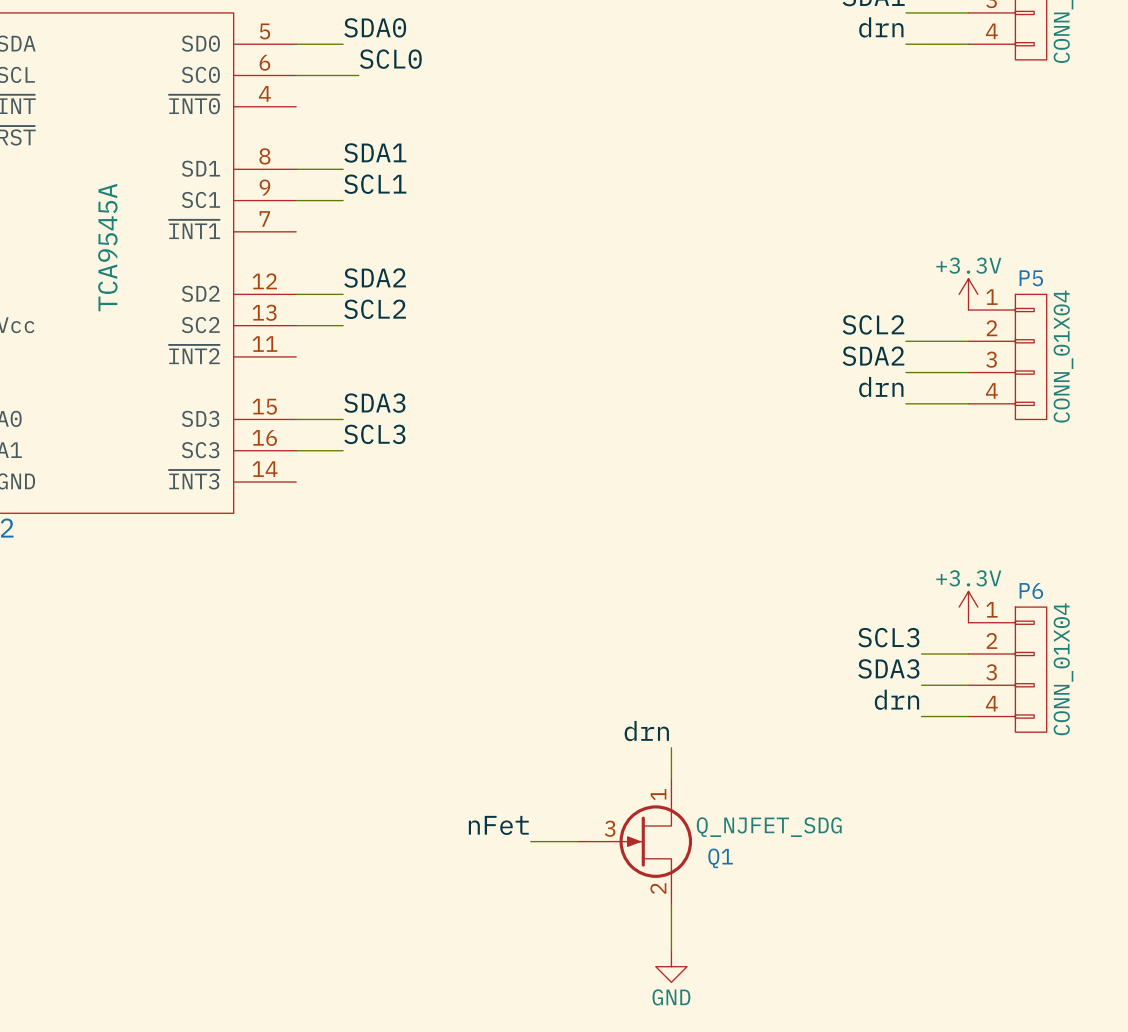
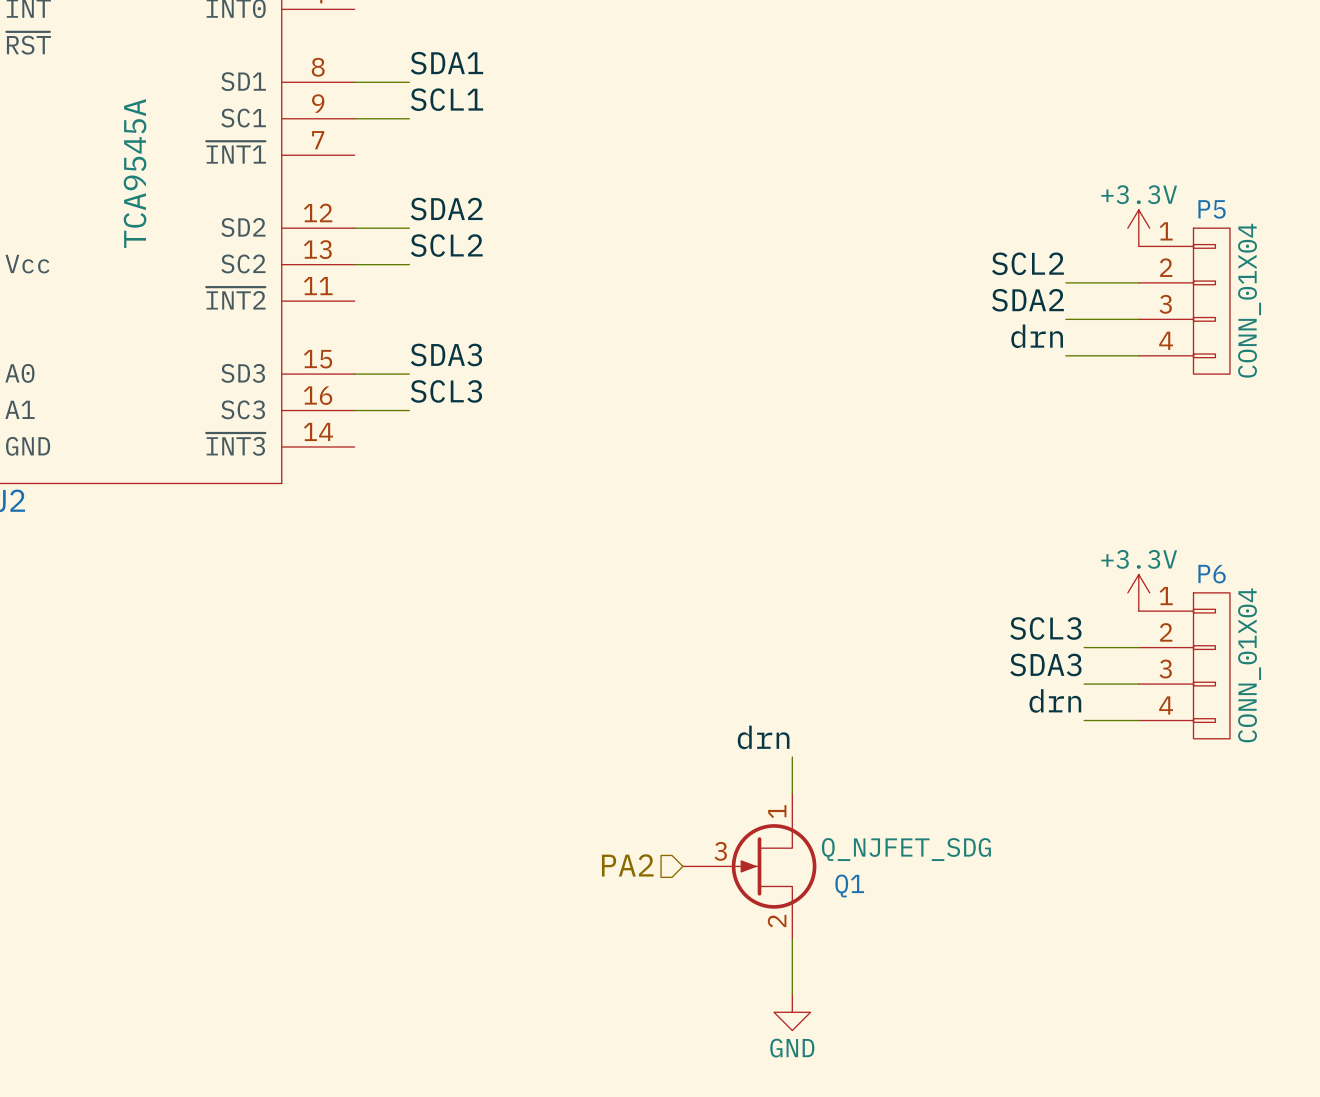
label: nFet (498, 825) -> none
hierarchical label: none -> PA2 (627, 865)
wire: (530, 841) (577, 841) -> none

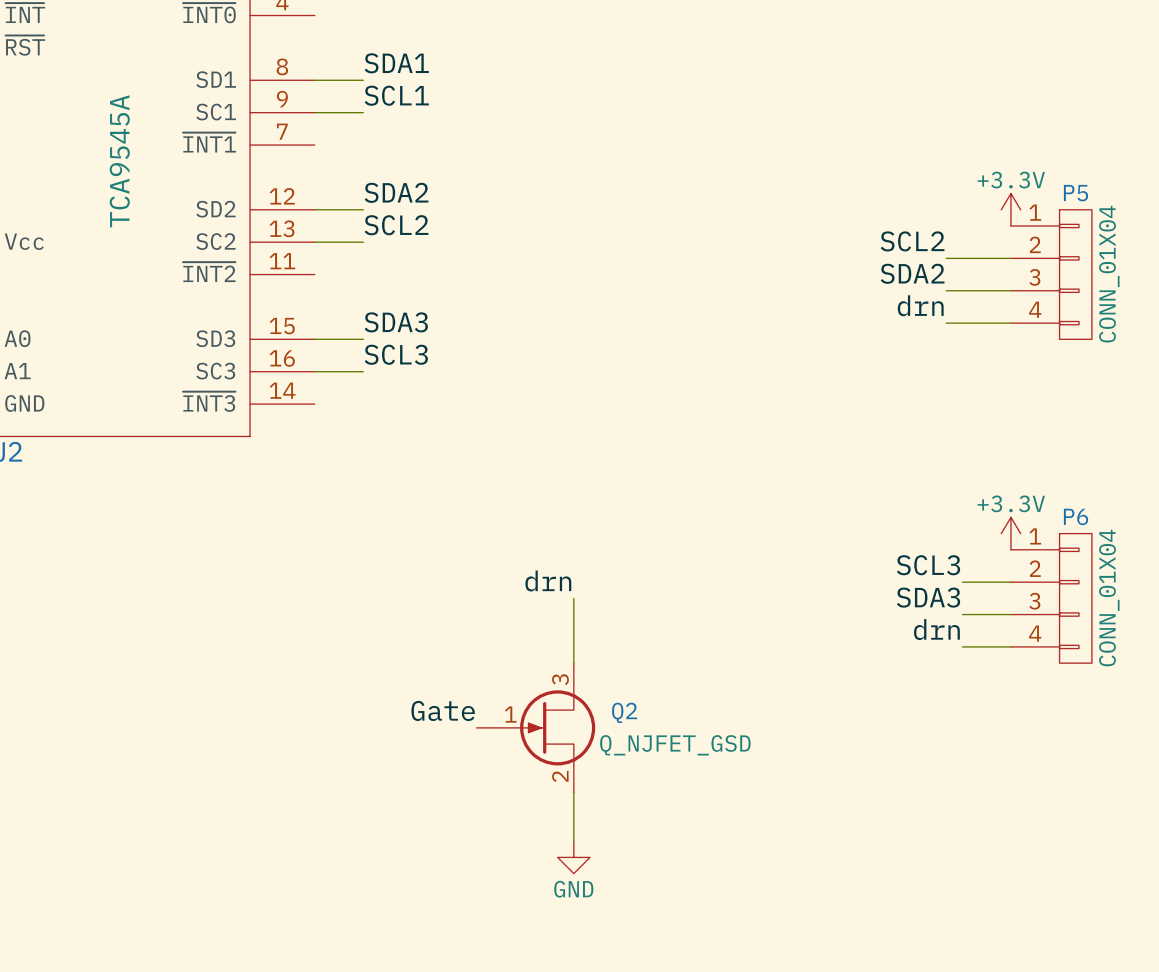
wire: none -> (573, 598) (573, 663)
label position: drn (763, 737) -> drn (548, 581)
wire: (792, 757) (792, 793) -> none
label: none -> Gate (443, 710)
Q2: none -> Q_NJFET_GSD (535, 727)
hierarchical label: PA2 (627, 865) -> none
Q1: Q_NJFET_SDG (749, 866) -> none
wire: (792, 939) (792, 994) -> (573, 792) (573, 841)
power symbol position: GND (792, 1012) -> GND (573, 857)

